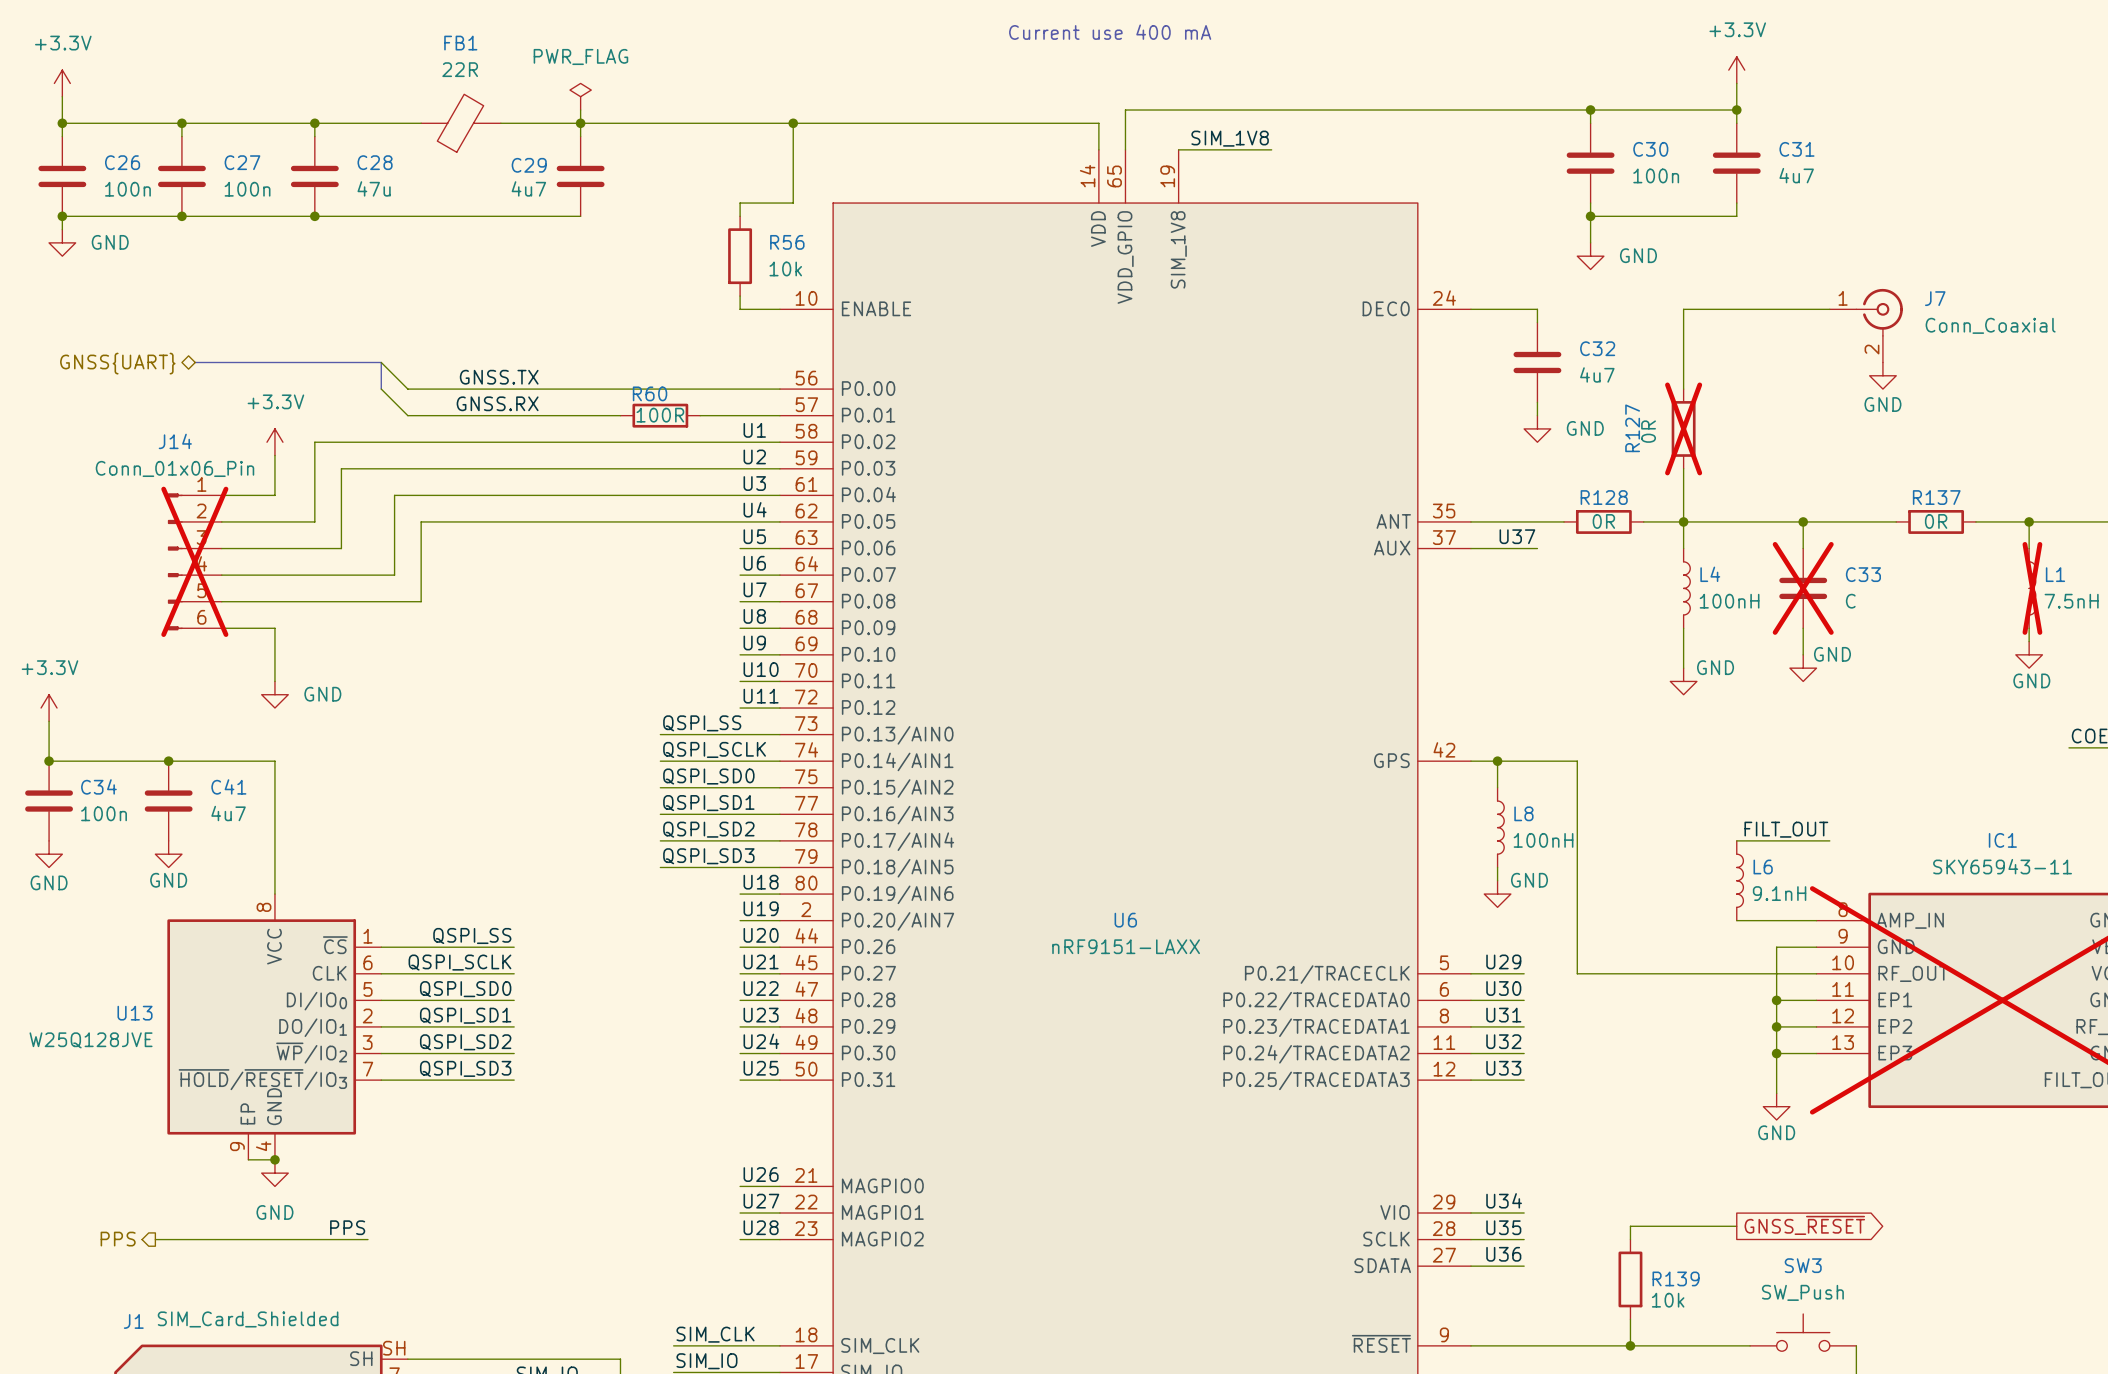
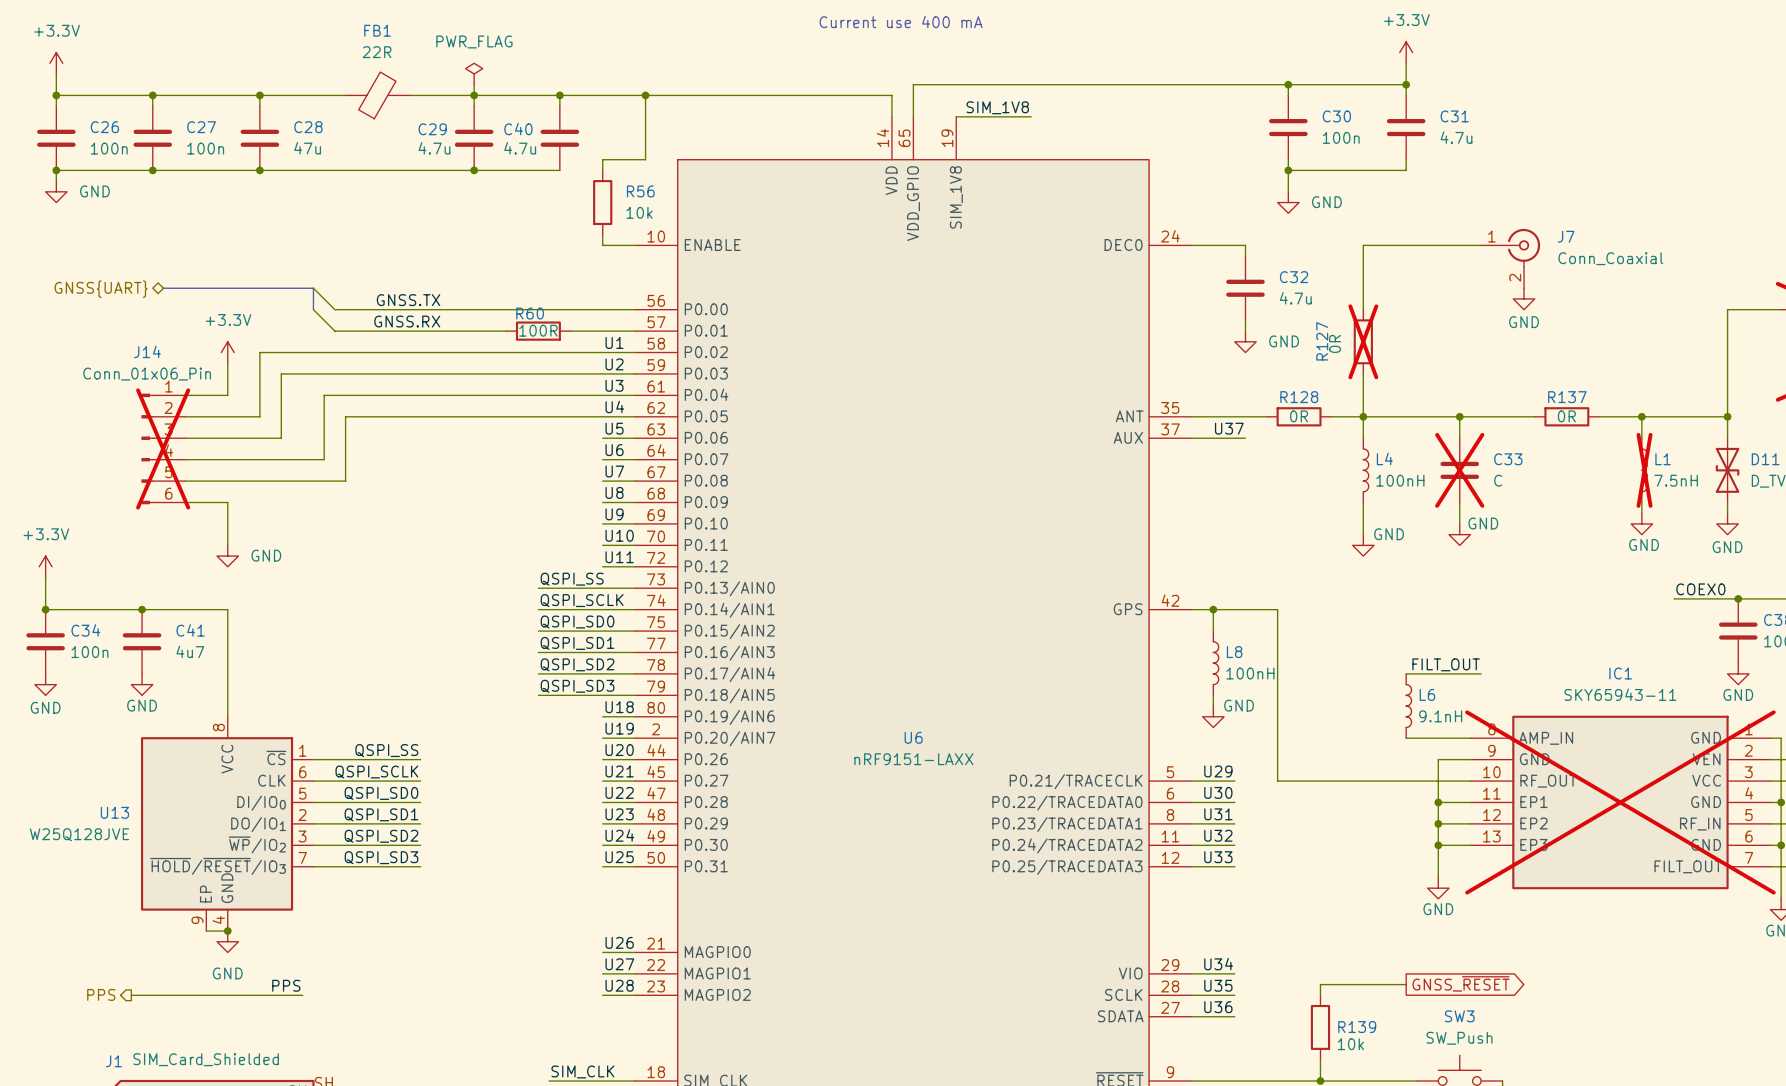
wire: none -> (559, 95) (559, 106)
junction: none -> (559, 95)
C31 value: 4u7 (1796, 175) -> 4.7u (1456, 137)
C40: none -> 4.7u (559, 138)
C29 value: 4u7 (528, 188) -> 4.7u (434, 148)
wire: none -> (474, 170) (559, 170)
junction: none -> (474, 170)
C32 value: 4u7 (1597, 374) -> 4.7u (1295, 298)

